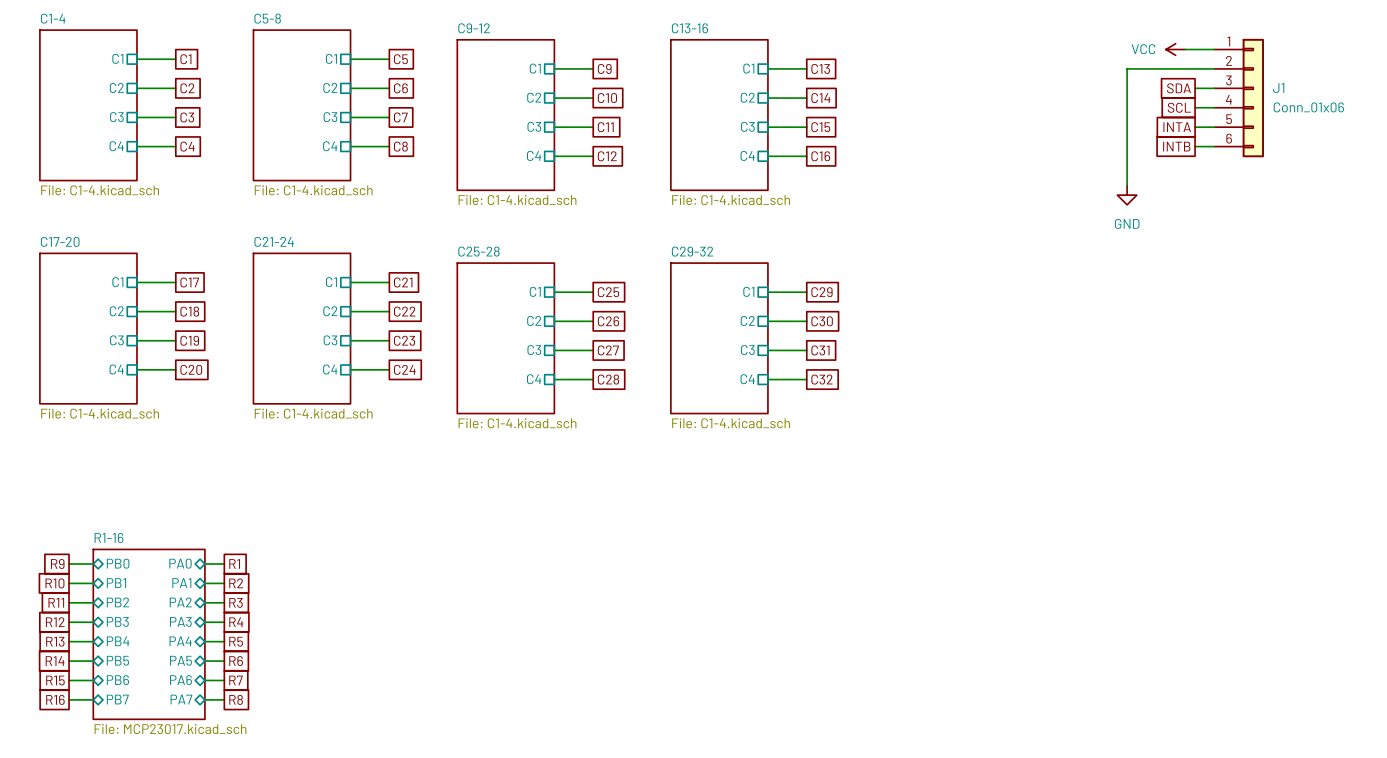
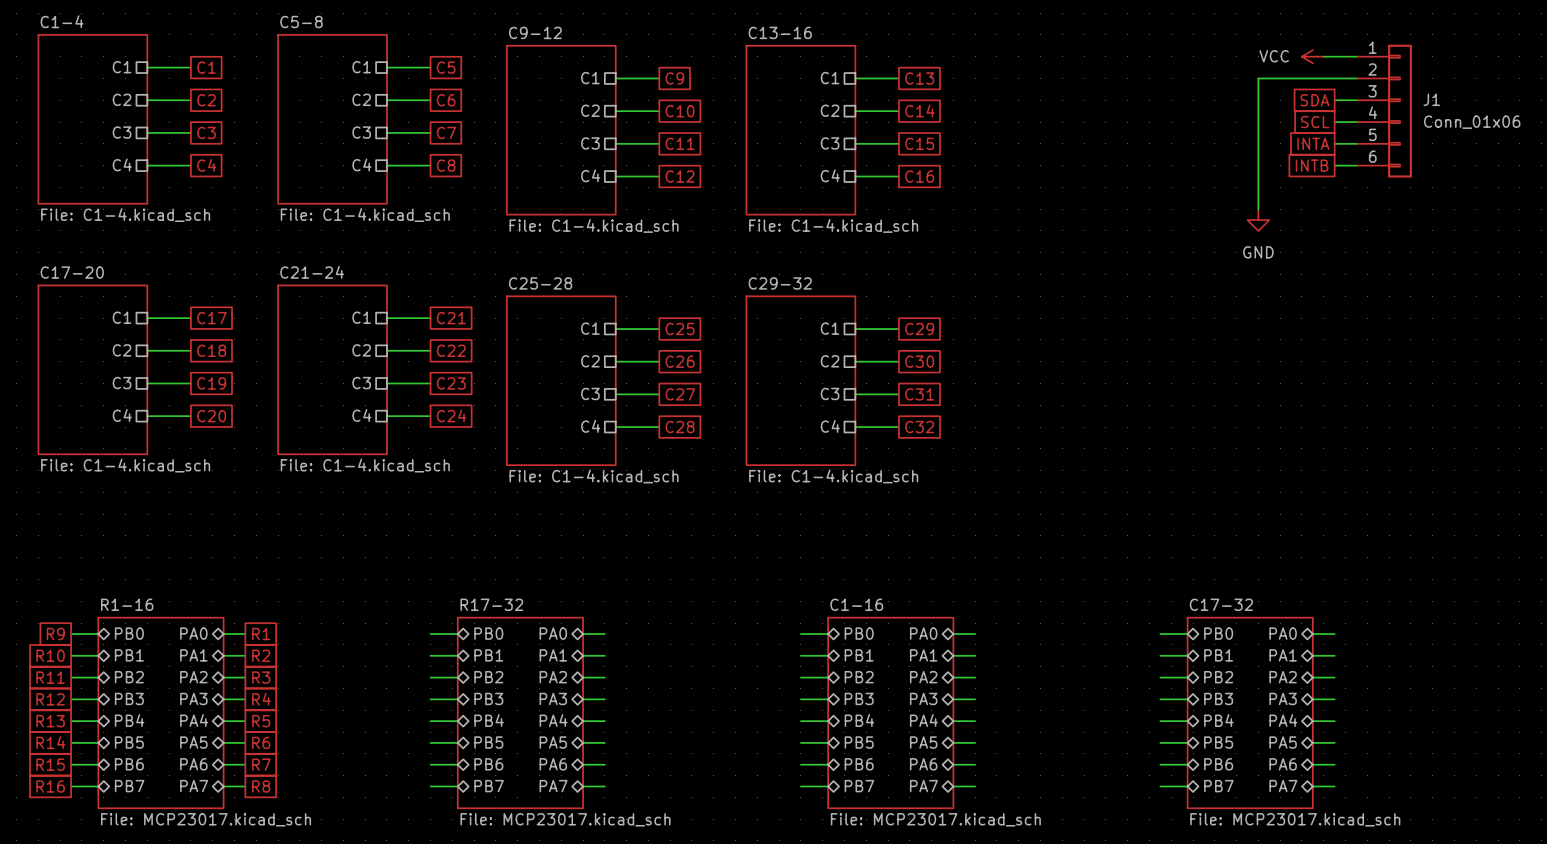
sheet pin: none -> PB0 (488, 633)
sheet pin: none -> PA0 (553, 633)
sheet pin: none -> PB0 (859, 633)
sheet pin: none -> PA0 (923, 633)
sheet pin: none -> PB0 (1218, 633)
sheet pin: none -> PA0 (1283, 633)
wire: none -> (430, 634) (457, 634)
wire: none -> (583, 634) (604, 634)
wire: none -> (800, 634) (828, 634)
wire: none -> (953, 634) (975, 634)
wire: none -> (1160, 634) (1187, 634)
wire: none -> (1312, 634) (1334, 634)
wire: none -> (430, 655) (457, 655)
sheet pin: none -> PB1 (488, 655)
sheet pin: none -> PA1 (553, 655)
wire: none -> (583, 655) (604, 655)
wire: none -> (800, 655) (828, 655)
sheet pin: none -> PB1 (859, 655)
sheet pin: none -> PA1 (923, 655)
wire: none -> (953, 655) (975, 655)
wire: none -> (1160, 655) (1187, 655)
sheet pin: none -> PB1 (1218, 655)
sheet pin: none -> PA1 (1283, 655)
wire: none -> (1312, 655) (1334, 655)
wire: none -> (430, 677) (457, 677)
sheet pin: none -> PB2 (488, 677)
sheet pin: none -> PA2 (553, 677)
wire: none -> (583, 677) (604, 677)
wire: none -> (800, 677) (828, 677)
sheet pin: none -> PB2 (859, 677)
sheet pin: none -> PA2 (923, 677)
wire: none -> (953, 677) (975, 677)
wire: none -> (1160, 677) (1187, 677)
sheet pin: none -> PB2 (1218, 677)
sheet pin: none -> PA2 (1283, 677)
wire: none -> (1312, 677) (1334, 677)
sheet pin: none -> PB3 (488, 698)
sheet pin: none -> PA3 (553, 698)
sheet pin: none -> PB3 (859, 698)
sheet pin: none -> PA3 (923, 698)
sheet pin: none -> PB3 (1218, 698)
sheet pin: none -> PA3 (1283, 698)
wire: none -> (430, 699) (457, 699)
wire: none -> (583, 699) (604, 699)
wire: none -> (800, 699) (828, 699)
wire: none -> (953, 699) (975, 699)
wire: none -> (1160, 699) (1187, 699)
wire: none -> (1312, 699) (1334, 699)
sheet R17-32: none -> File: MCP23017.kicad_sch (520, 712)
sheet C1-16: none -> File: MCP23017.kicad_sch (890, 712)
sheet C17-32: none -> File: MCP23017.kicad_sch (1250, 712)
wire: none -> (430, 721) (457, 721)
sheet pin: none -> PB4 (489, 720)
sheet pin: none -> PA4 (553, 720)
wire: none -> (583, 721) (604, 721)
wire: none -> (800, 721) (828, 721)
sheet pin: none -> PB4 (859, 720)
sheet pin: none -> PA4 (923, 720)
wire: none -> (953, 721) (975, 721)
wire: none -> (1160, 721) (1187, 721)
sheet pin: none -> PB4 (1218, 720)
sheet pin: none -> PA4 (1283, 720)
wire: none -> (1312, 721) (1334, 721)
sheet pin: none -> PB5 (488, 742)
sheet pin: none -> PA5 (553, 742)
sheet pin: none -> PB5 (859, 742)
sheet pin: none -> PA5 (923, 742)
sheet pin: none -> PB5 (1218, 742)
sheet pin: none -> PA5 (1283, 742)
wire: none -> (430, 742) (457, 742)
wire: none -> (583, 742) (604, 742)
wire: none -> (800, 742) (828, 742)
wire: none -> (953, 742) (975, 742)
wire: none -> (1160, 742) (1187, 742)
wire: none -> (1312, 742) (1334, 742)
wire: none -> (430, 764) (457, 764)
sheet pin: none -> PB6 (488, 764)
sheet pin: none -> PA6 (553, 764)
wire: none -> (583, 764) (604, 764)
wire: none -> (800, 764) (828, 764)
sheet pin: none -> PB6 (859, 764)
sheet pin: none -> PA6 (923, 764)
wire: none -> (953, 764) (975, 764)
wire: none -> (1160, 764) (1187, 764)
sheet pin: none -> PB6 (1218, 764)
sheet pin: none -> PA6 (1283, 764)
wire: none -> (1312, 764) (1334, 764)
wire: none -> (430, 786) (457, 786)
sheet pin: none -> PB7 (489, 786)
sheet pin: none -> PA7 (553, 786)
wire: none -> (583, 786) (604, 786)
wire: none -> (800, 786) (828, 786)
sheet pin: none -> PB7 (859, 786)
sheet pin: none -> PA7 (923, 786)
wire: none -> (953, 786) (975, 786)
wire: none -> (1160, 786) (1187, 786)
sheet pin: none -> PB7 (1218, 786)
sheet pin: none -> PA7 (1283, 786)
wire: none -> (1312, 786) (1334, 786)

